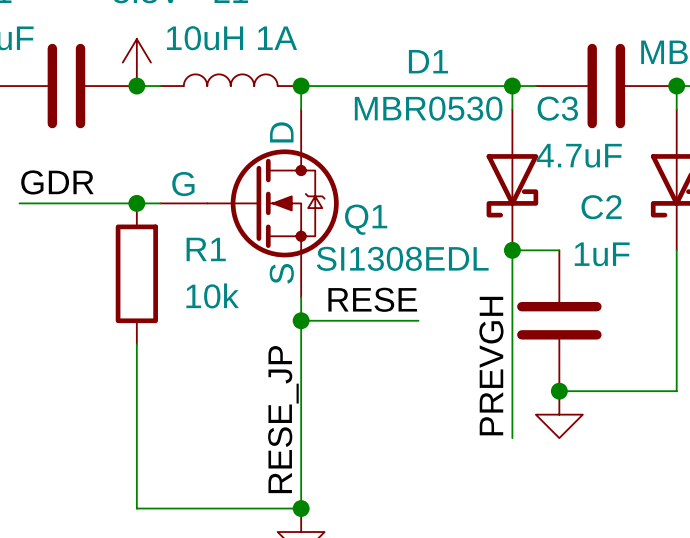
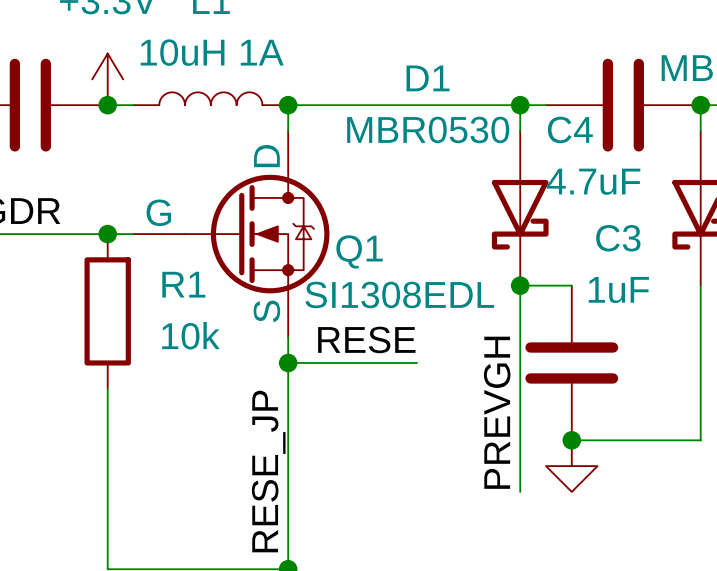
C3 name: C3 (557, 108) -> C4 (570, 129)
C2 name: C2 (601, 207) -> C3 (618, 238)

